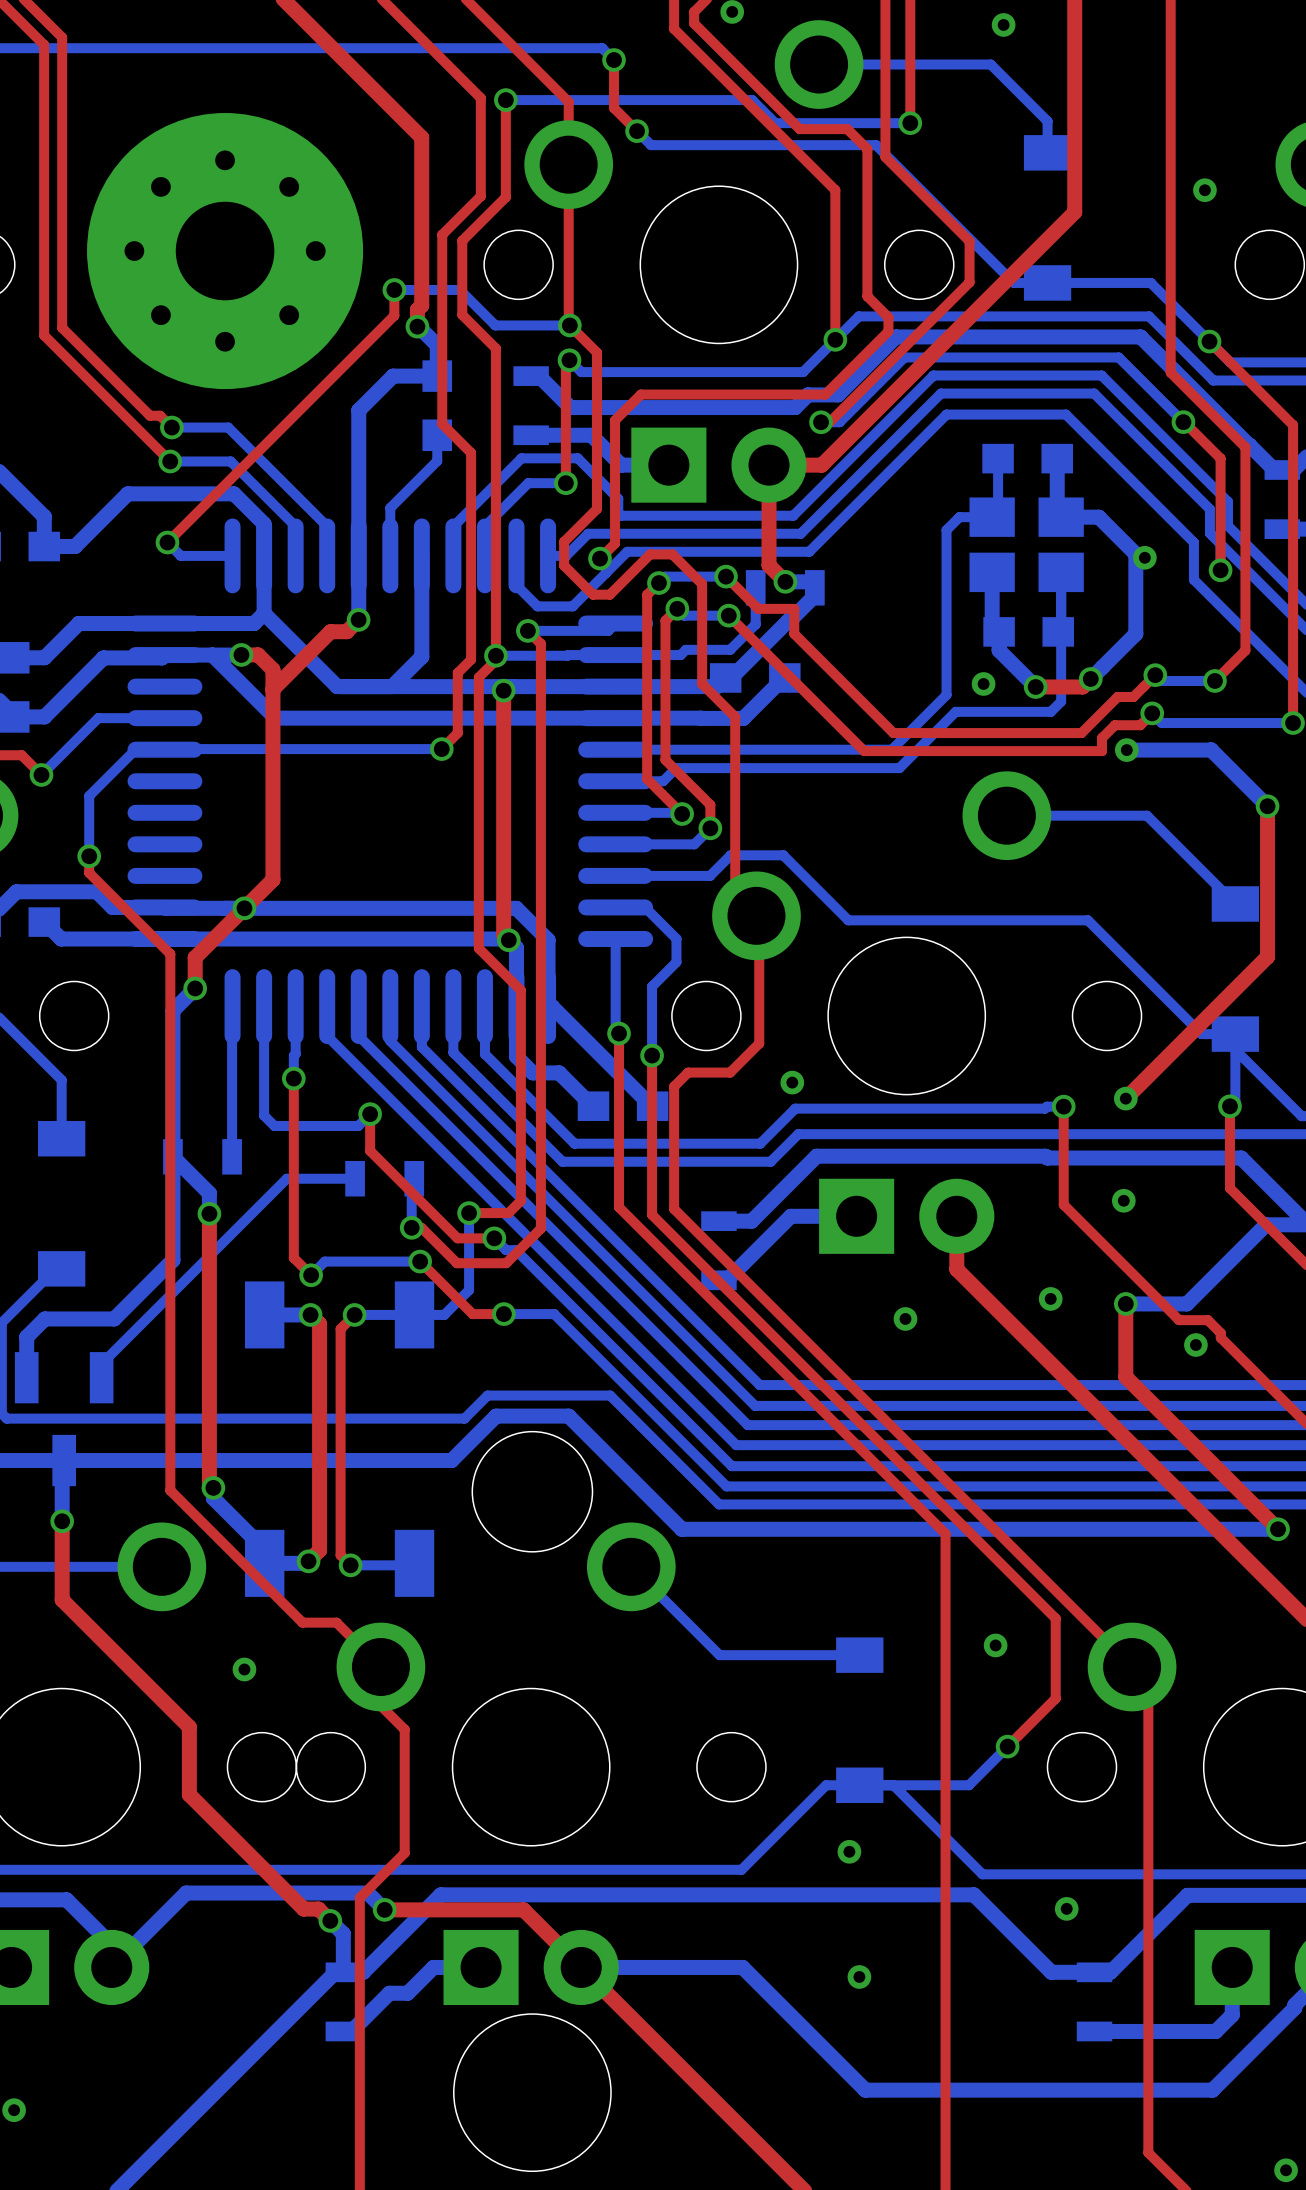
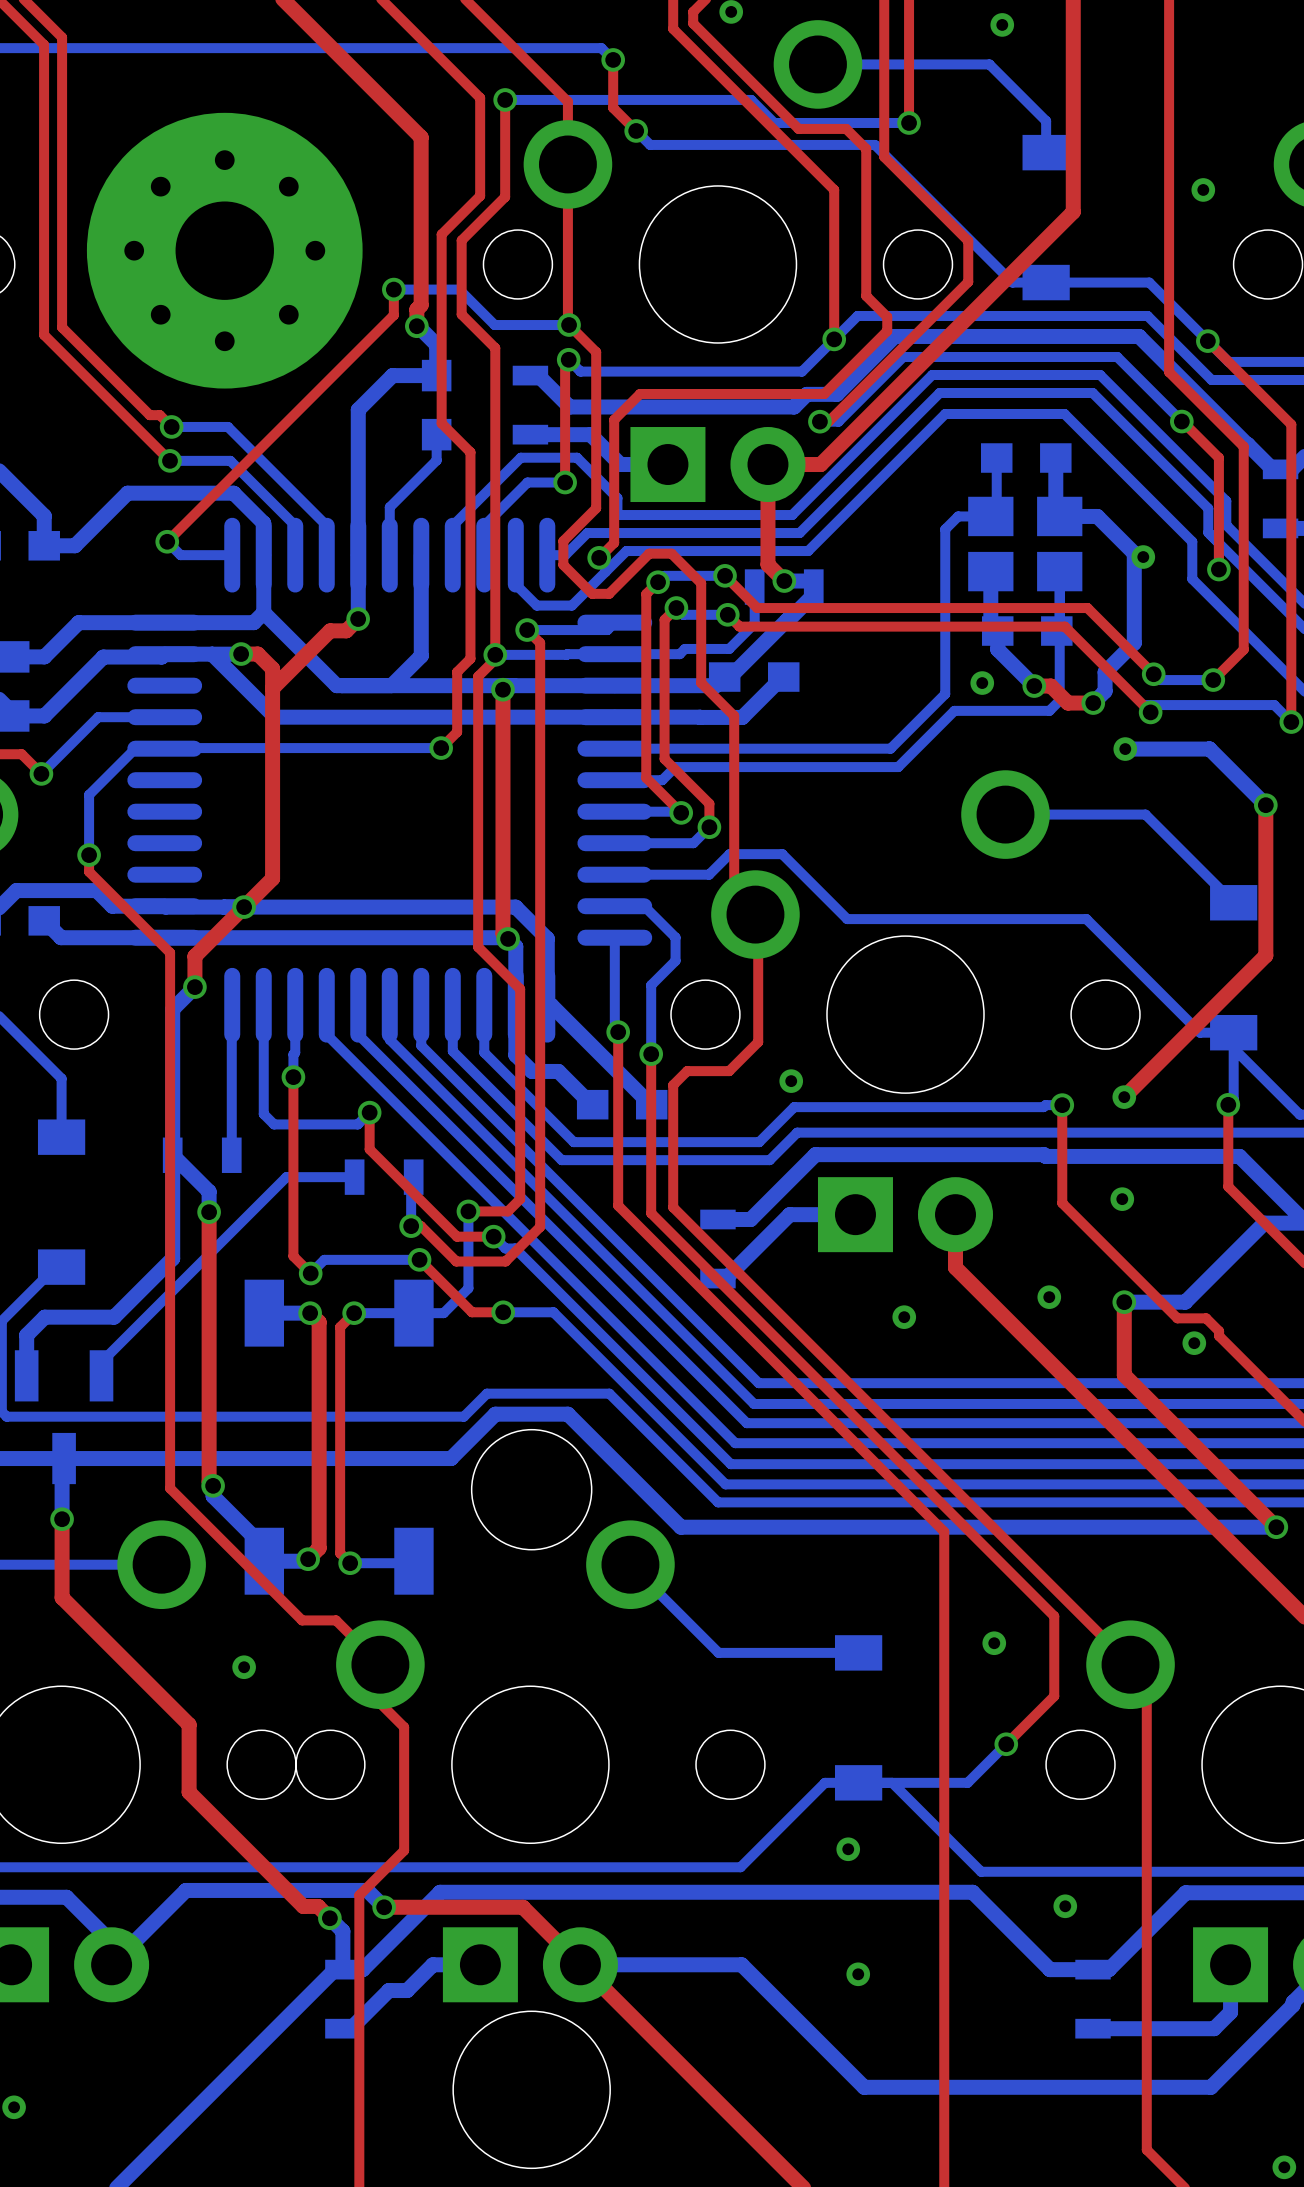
top track: (794, 608) (794, 633) (893, 733) (1081, 733) (1117, 697) (1133, 697) (1155, 675) -> (793, 608) (1087, 608) (1153, 674)
top track: (740, 627) (864, 751) (1101, 751) (1101, 738) (1114, 725) (1140, 725) (1152, 713) -> (739, 626) (1064, 626) (1143, 705)
bottom track: (1135, 633) (1090, 678) -> (1134, 633) (1134, 643) (1105, 672) (1105, 691) (1093, 703)
top track: (1090, 678) (1082, 686) (1052, 686) -> (1093, 703) (1067, 703) (1050, 686)
via position: (1090, 678) -> (1093, 703)
bottom track: (1152, 713) (1161, 723) (1293, 723) -> (1143, 705) (1274, 705) (1291, 722)

